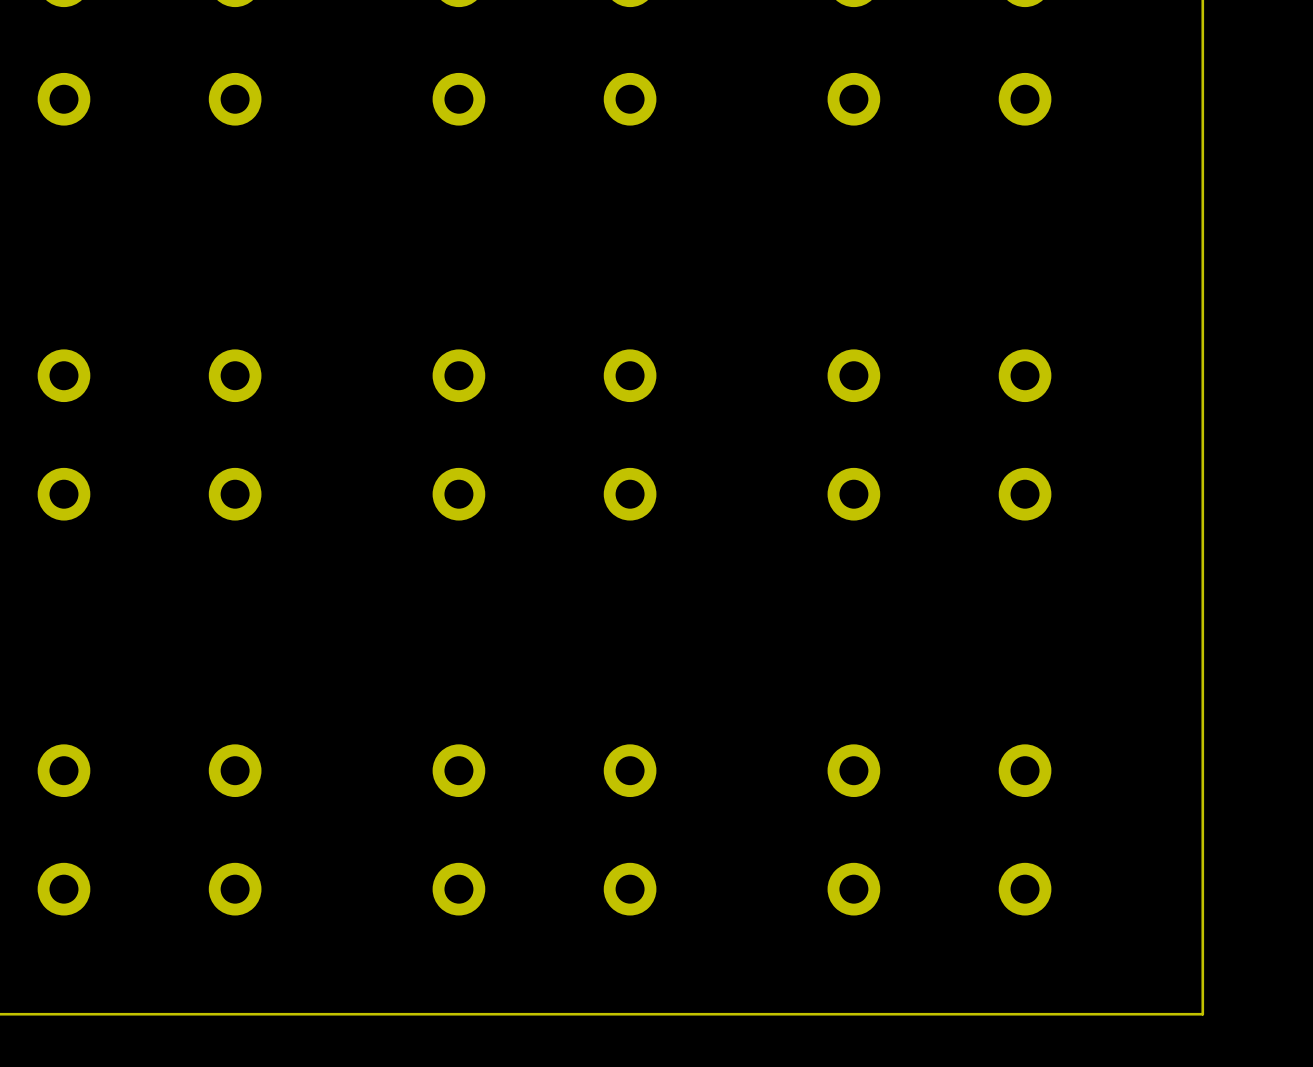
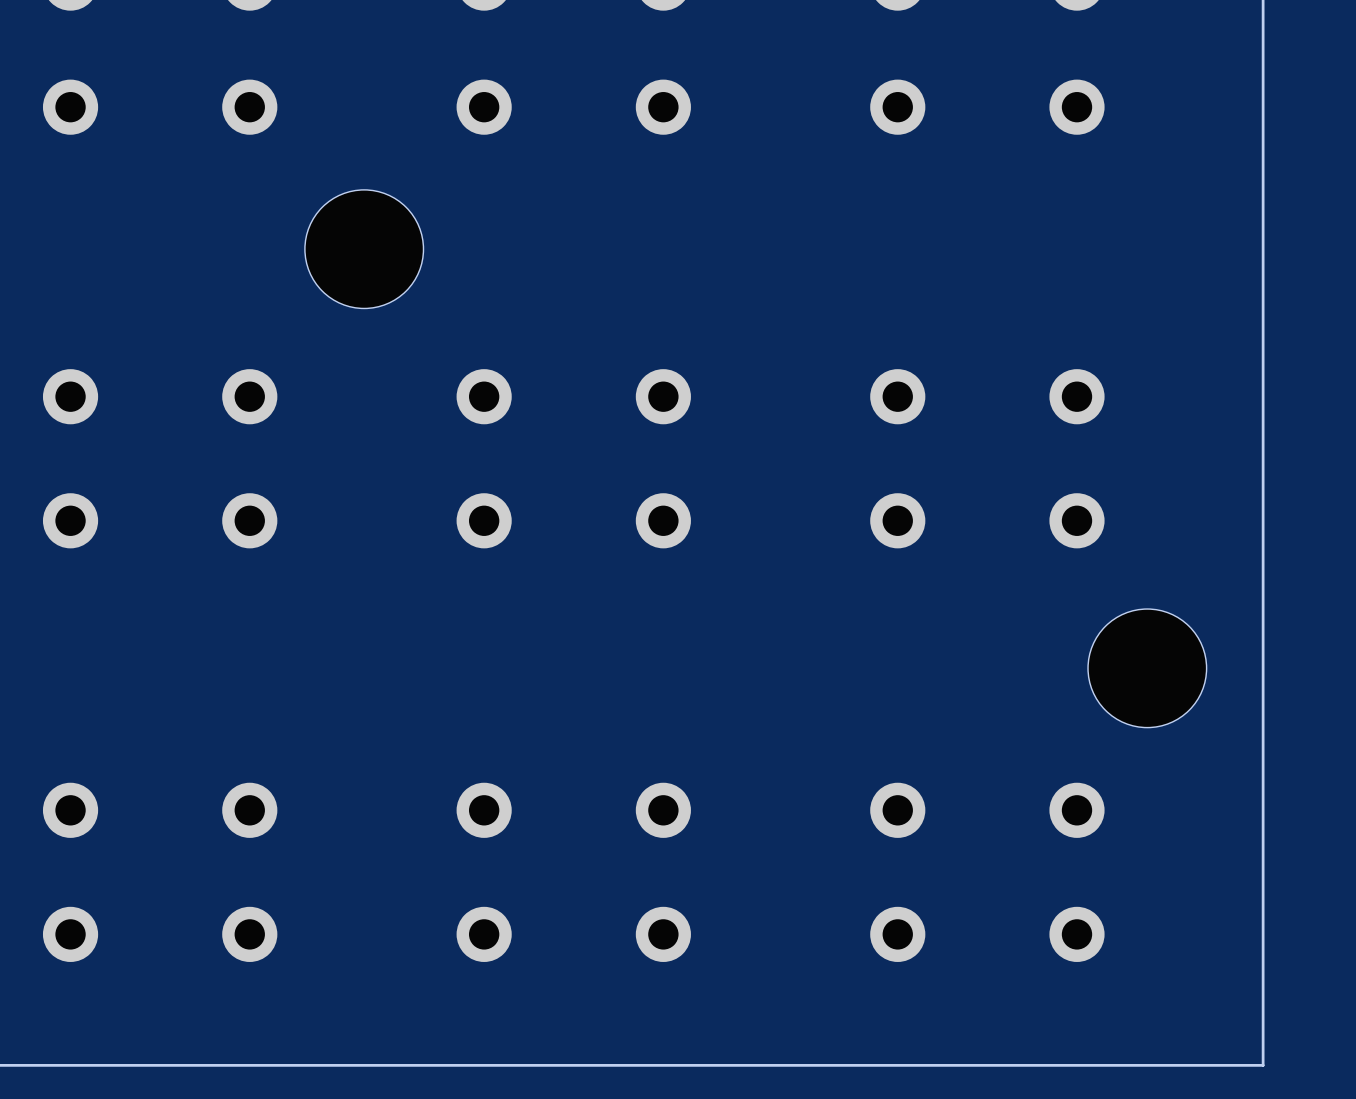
part: none -> (364, 249)
part: none -> (1147, 668)

